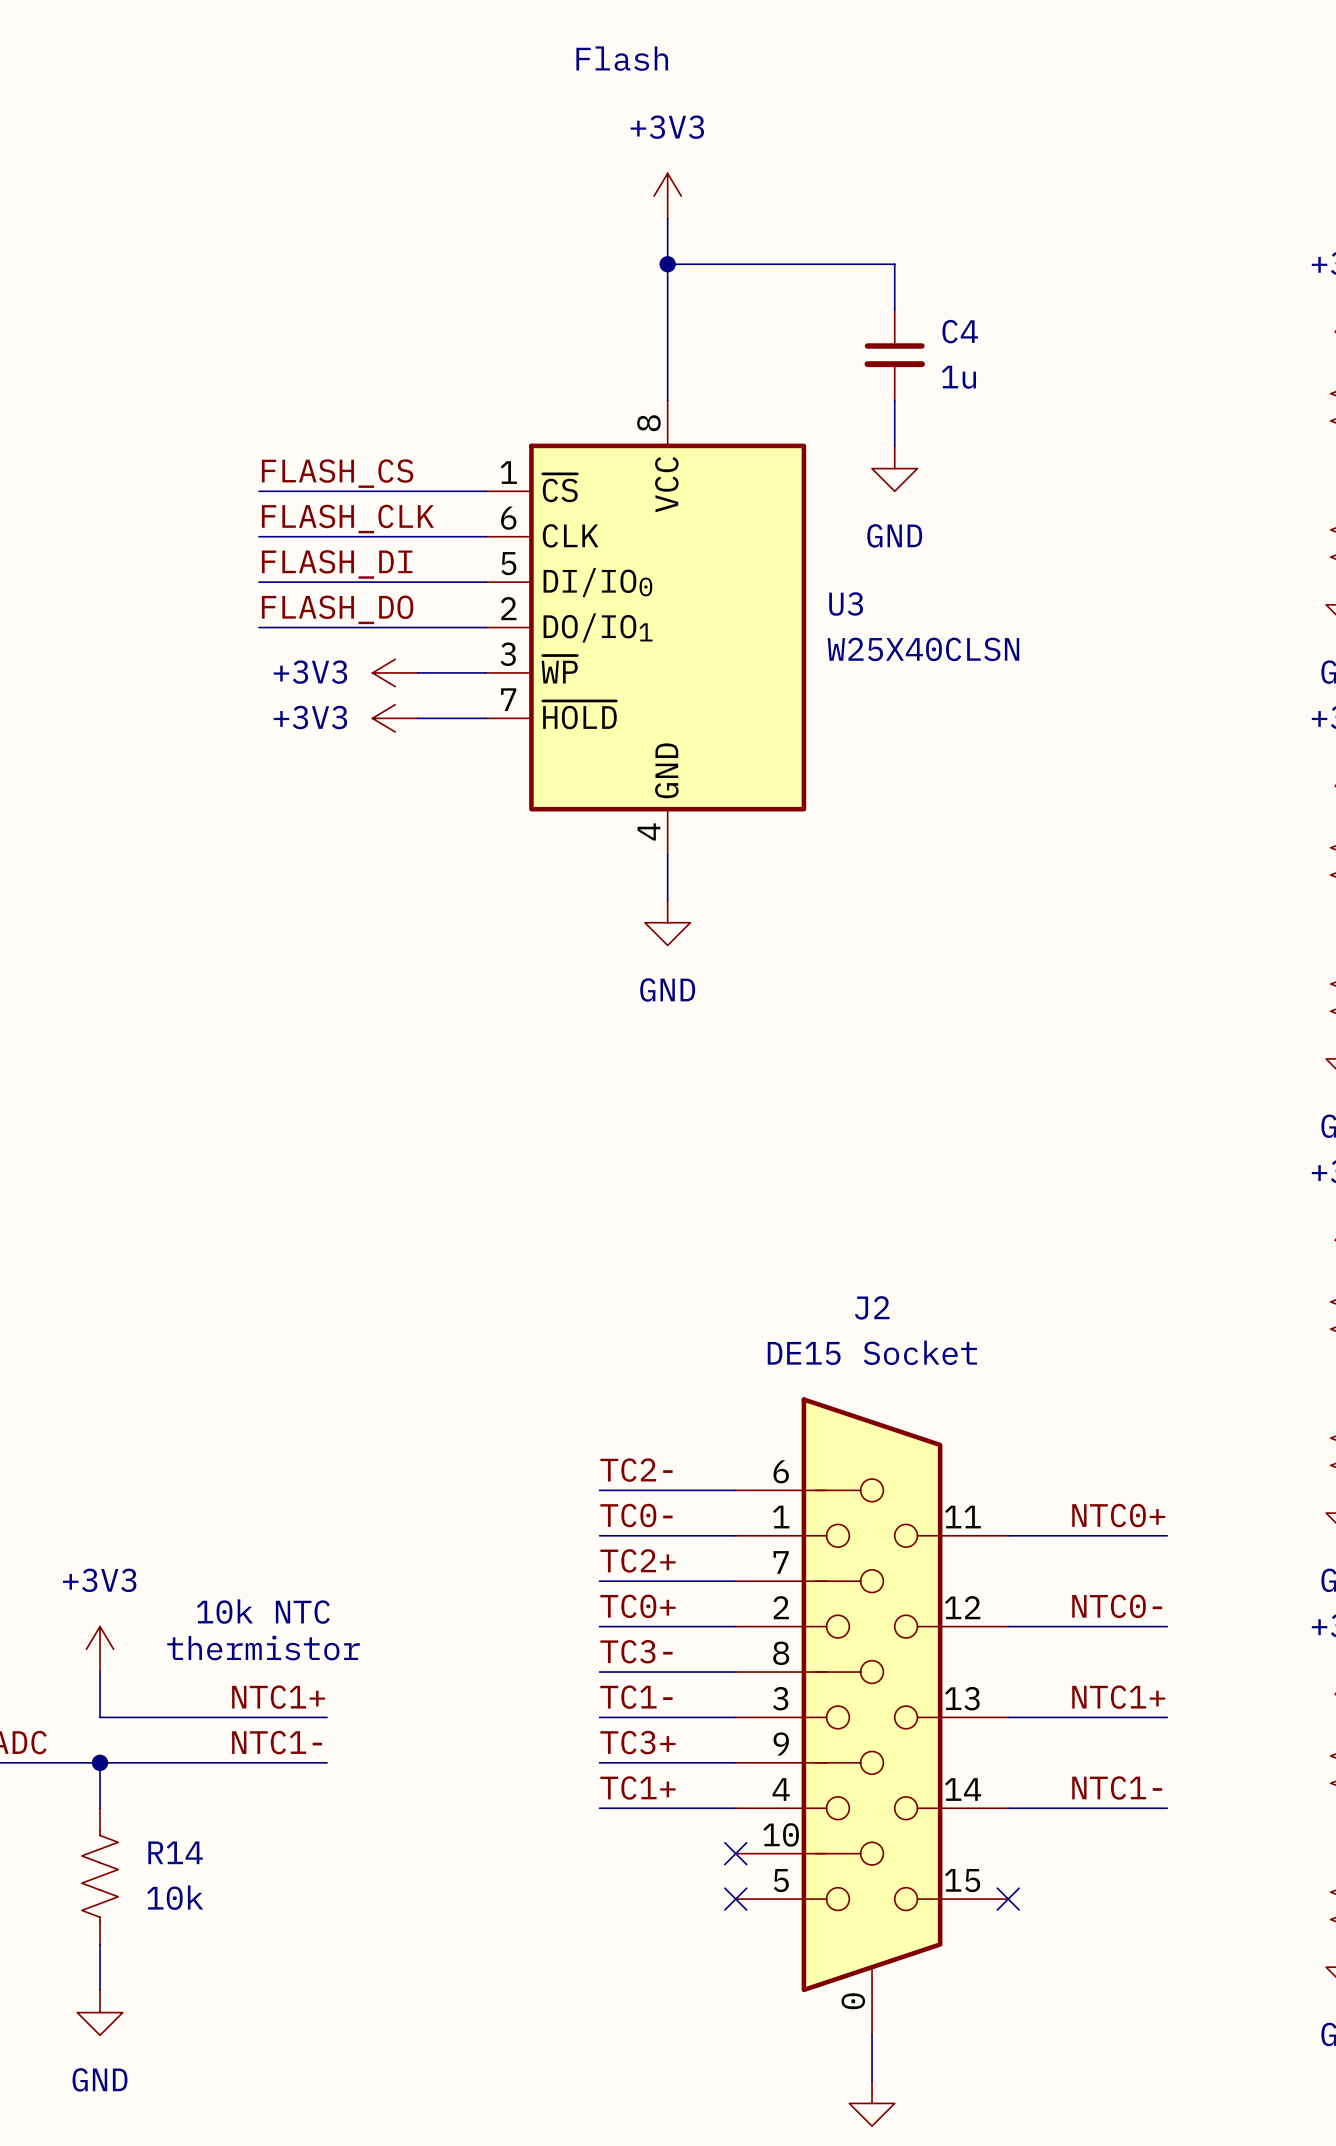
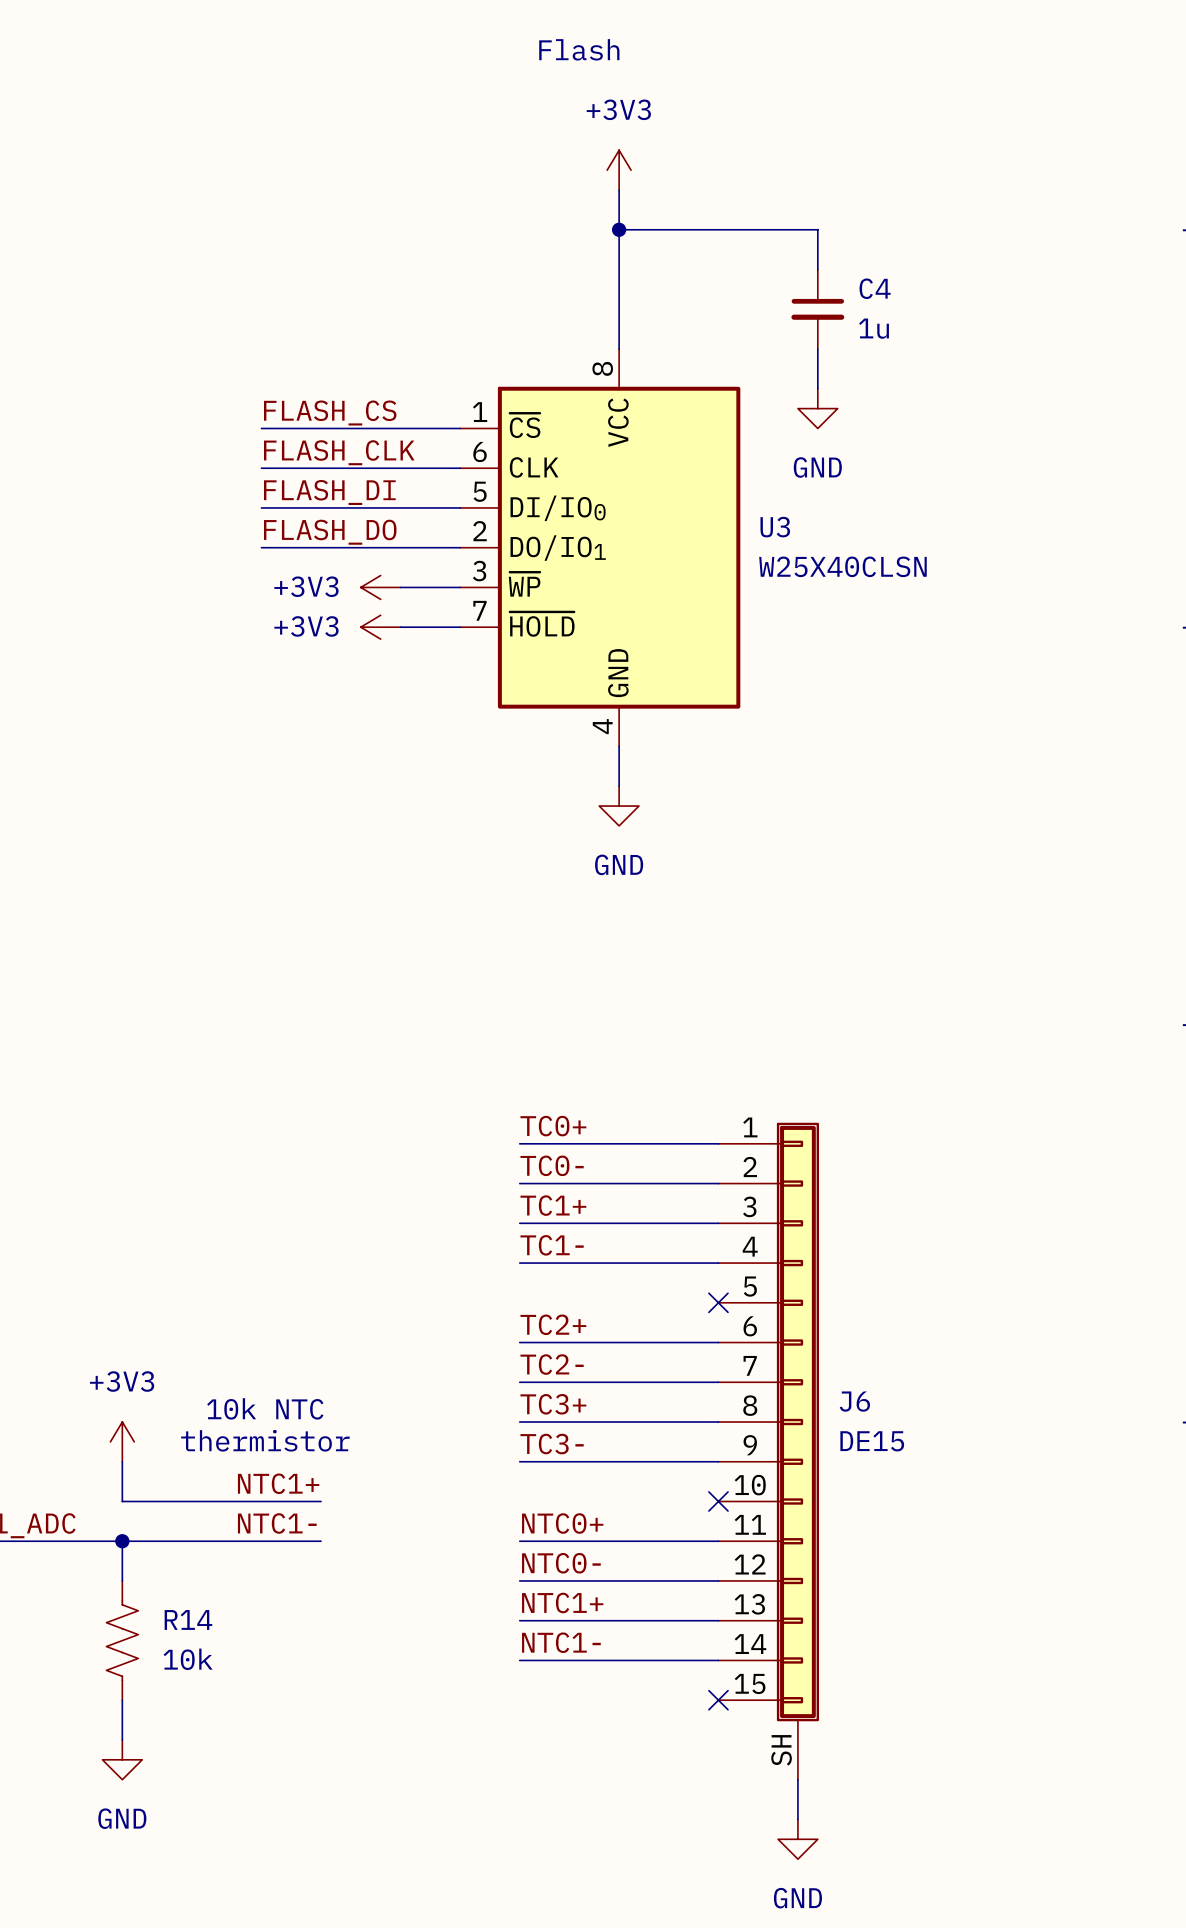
wire: none -> (519, 1143) (718, 1143)
wire: none -> (519, 1183) (718, 1183)
wire: none -> (519, 1223) (718, 1223)
wire: none -> (519, 1263) (718, 1263)
label position: TC2- (636, 1470) -> TC2- (552, 1364)
wire: (599, 1490) (735, 1490) -> none
no-connect mark: none -> (718, 1302)
label position: TC0- (636, 1515) -> TC0- (552, 1165)
label: NTC0+ (1118, 1515) -> none
wire: none -> (519, 1342) (559, 1342)
wire: (1008, 1535) (1167, 1535) -> none
label position: TC2+ (637, 1560) -> TC2+ (553, 1324)
wire: none -> (519, 1382) (559, 1382)
label position: TC0+ (637, 1606) -> TC0+ (553, 1126)
label: NTC0- (1117, 1606) -> none
wire: none -> (519, 1422) (559, 1422)
wire: (1008, 1626) (1167, 1626) -> none
label position: TC3- (636, 1651) -> TC3- (552, 1444)
J6: none -> DE15 (768, 1451)
wire: none -> (519, 1461) (559, 1461)
label position: TC1- (636, 1697) -> TC1- (552, 1245)
label: NTC1+ (1118, 1697) -> none
J2: DE15 Socket (872, 1716) -> none
wire: (599, 1717) (735, 1717) -> none
no-connect mark: none -> (718, 1501)
wire: (1008, 1717) (1167, 1717) -> none
label: none -> NTC0+ (562, 1523)
label position: TC3+ (637, 1742) -> TC3+ (553, 1404)
wire: none -> (519, 1541) (559, 1541)
label: none -> NTC0- (561, 1563)
label position: TC1+ (637, 1787) -> TC1+ (553, 1205)
label: NTC1- (1117, 1787) -> none
wire: none -> (519, 1580) (559, 1580)
wire: (1008, 1808) (1167, 1808) -> none
label: none -> NTC1+ (562, 1602)
wire: none -> (519, 1620) (718, 1620)
no-connect mark: (735, 1853) -> none
label: none -> NTC1- (561, 1642)
wire: none -> (519, 1660) (718, 1660)
no-connect mark: (735, 1899) -> none
no-connect mark: (1008, 1899) -> none
no-connect mark: none -> (718, 1700)

